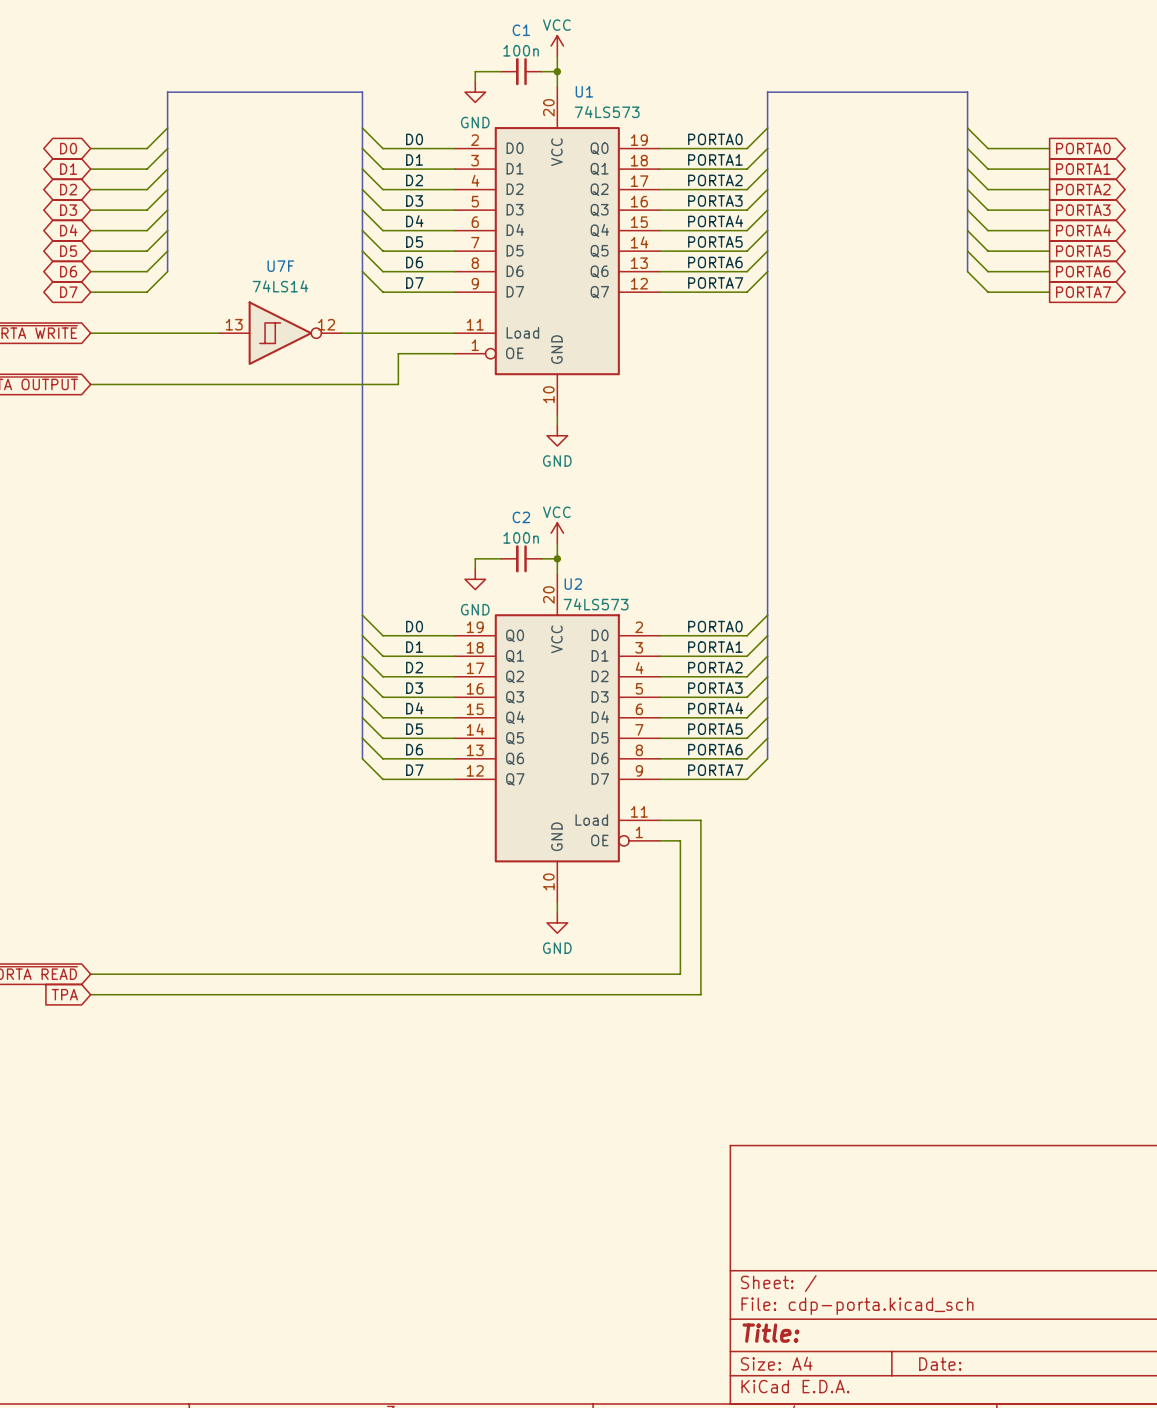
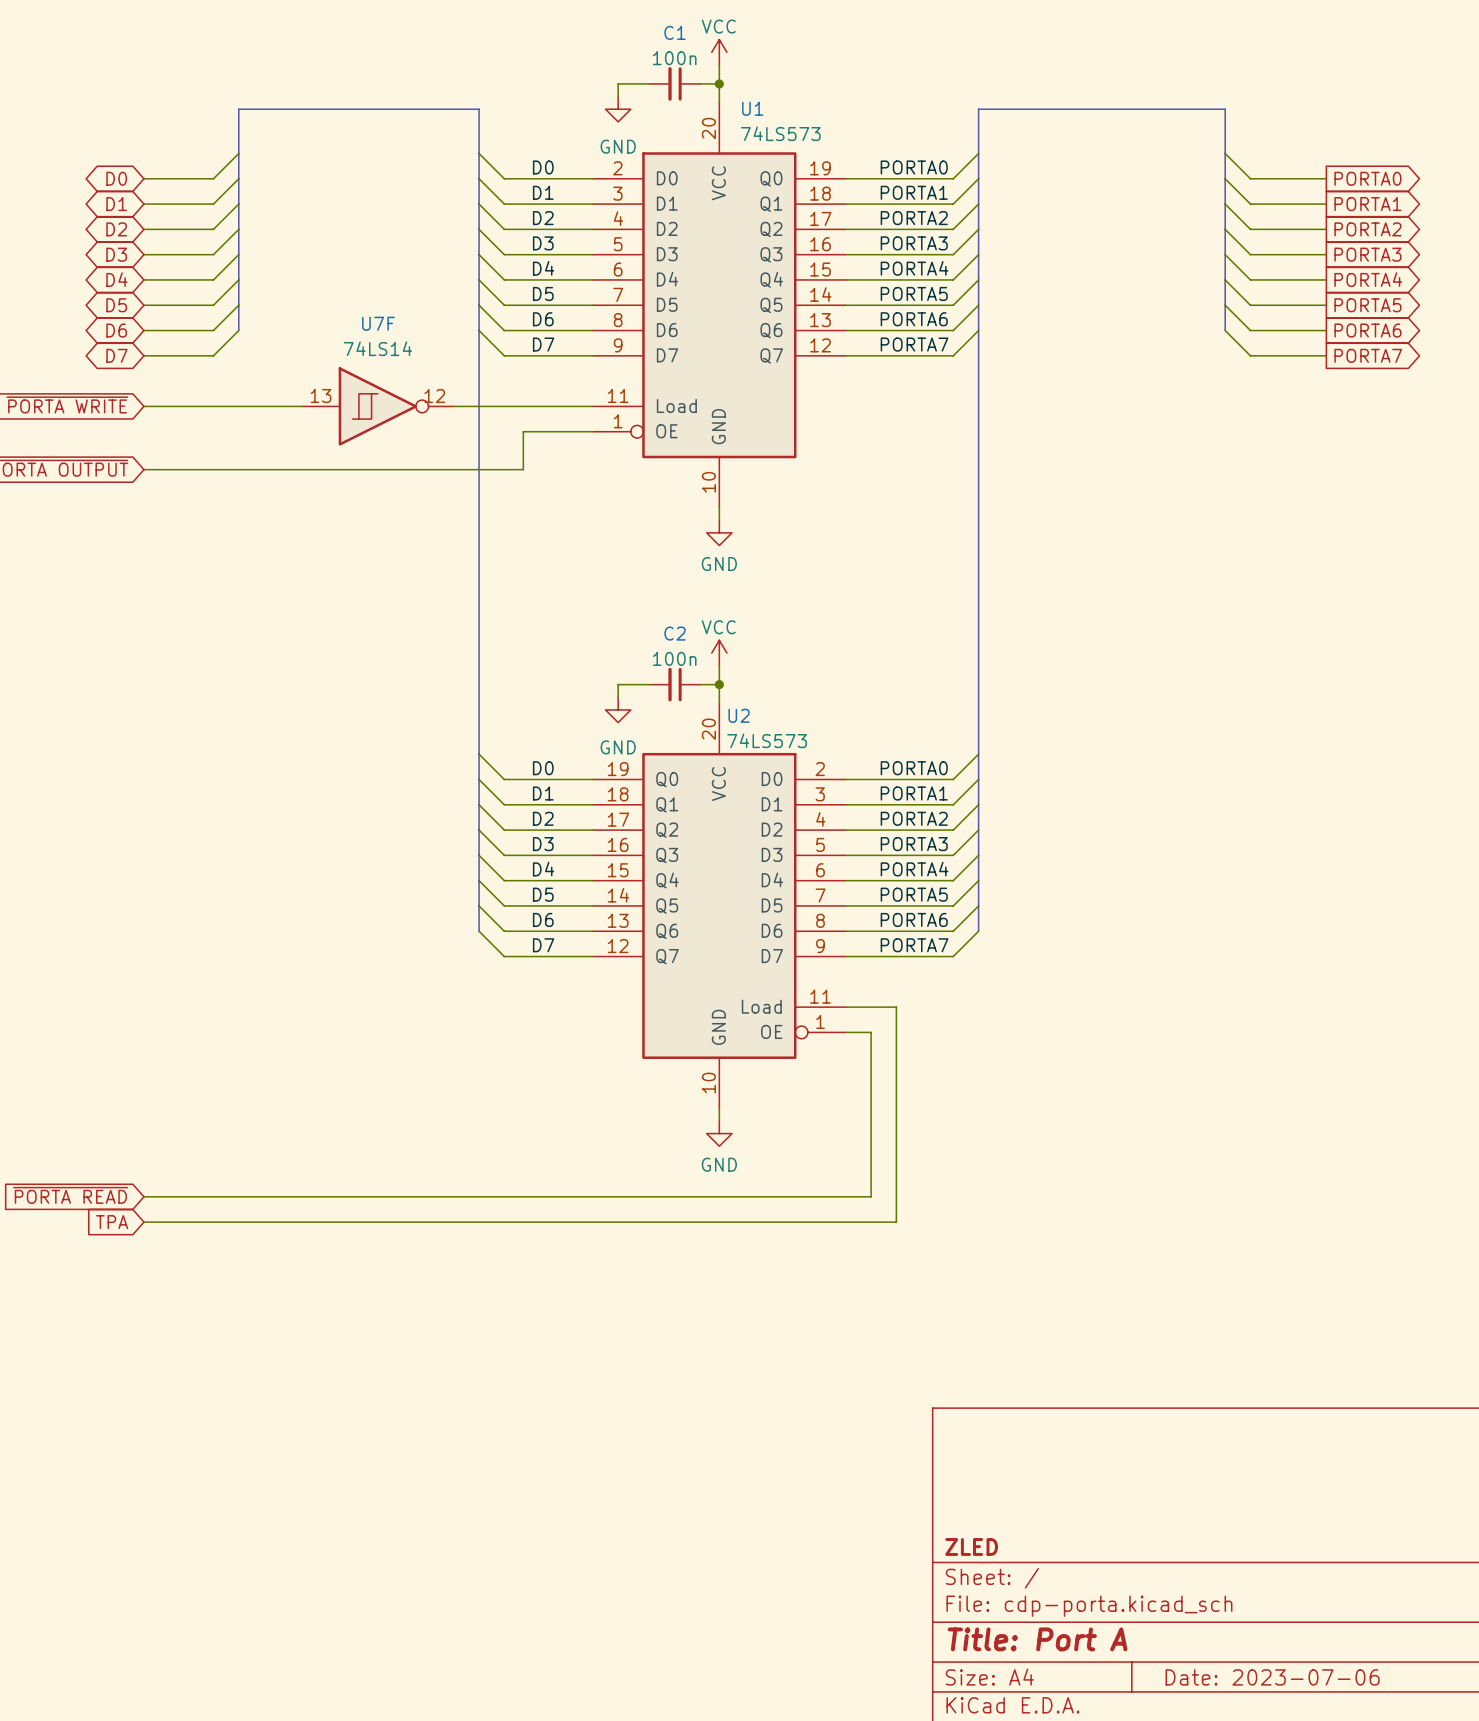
title block: none -> ZLED (971, 1546)
title block: Title: (770, 1333) -> Title: Port A (1037, 1639)
title block: Date: (940, 1363) -> Date: 2023-07-06 (1272, 1677)

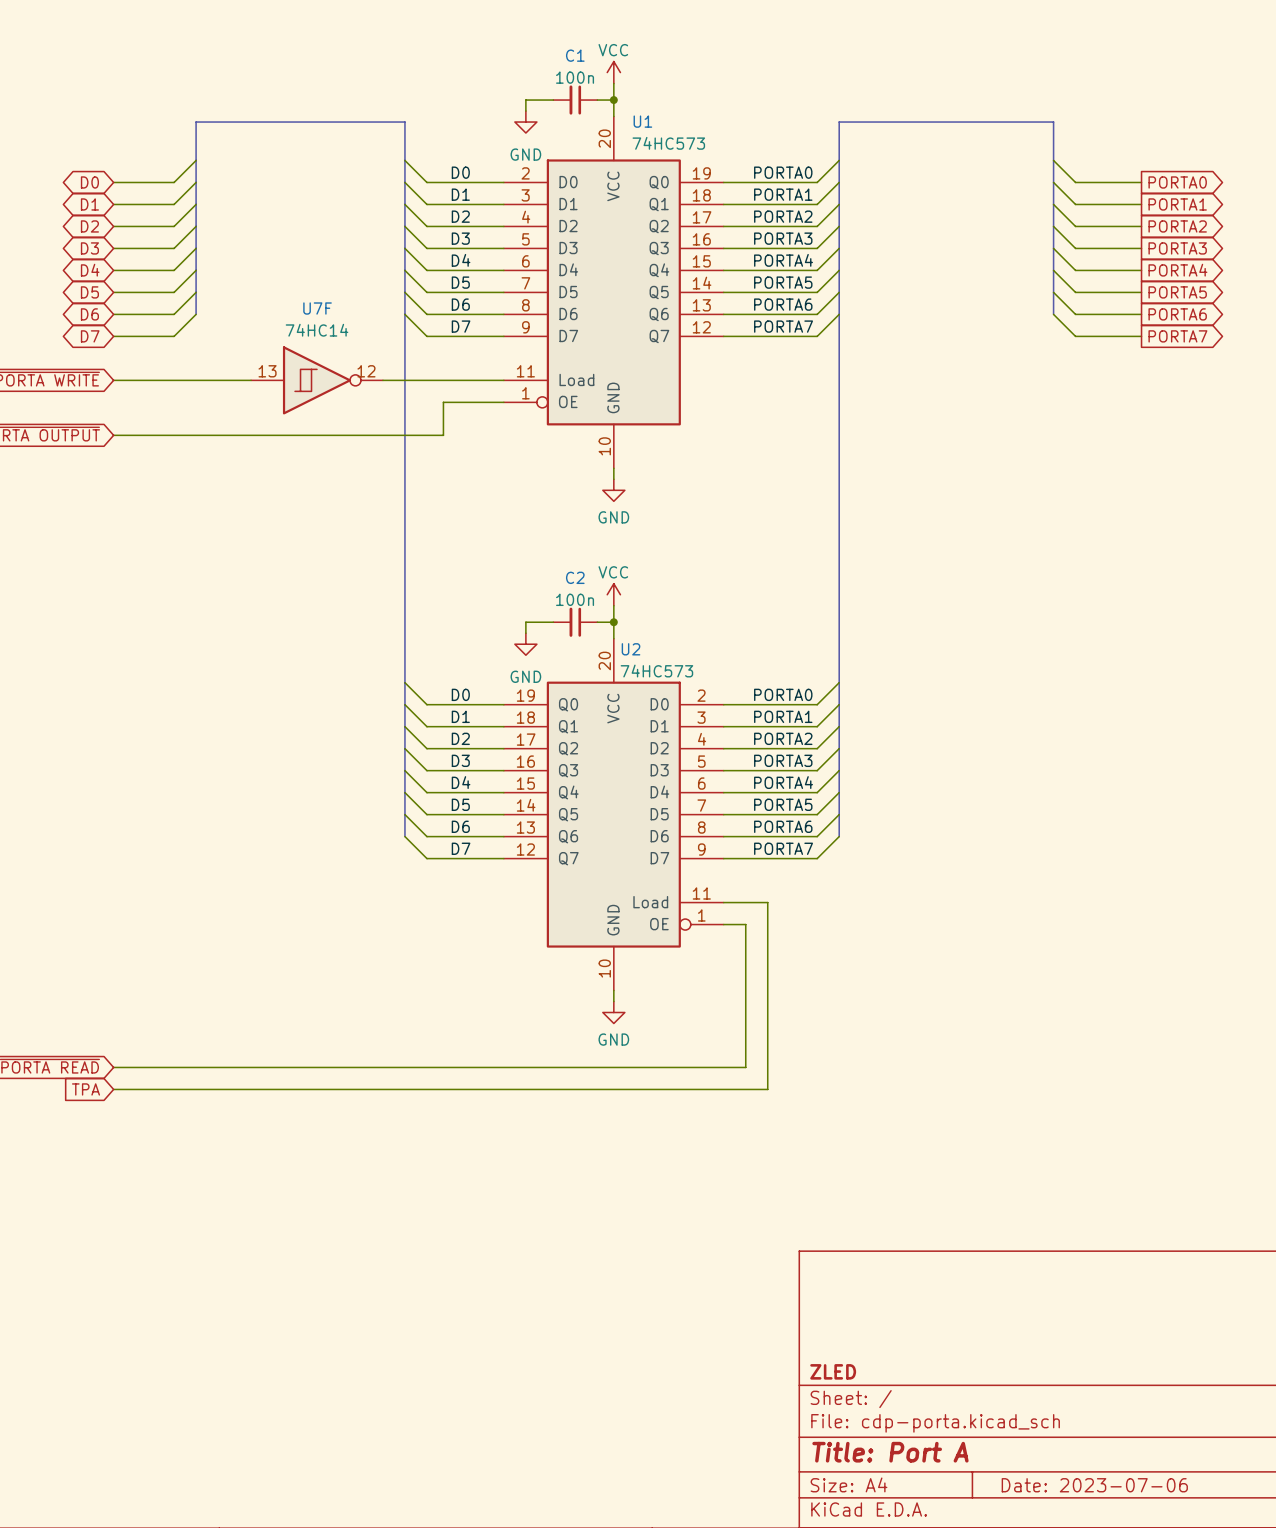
U1 value: 74LS573 (780, 133) -> 74HC573 (668, 143)
U7F value: 74LS14 (377, 348) -> 74HC14 (317, 330)
U2 value: 74LS573 (767, 740) -> 74HC573 (656, 671)

